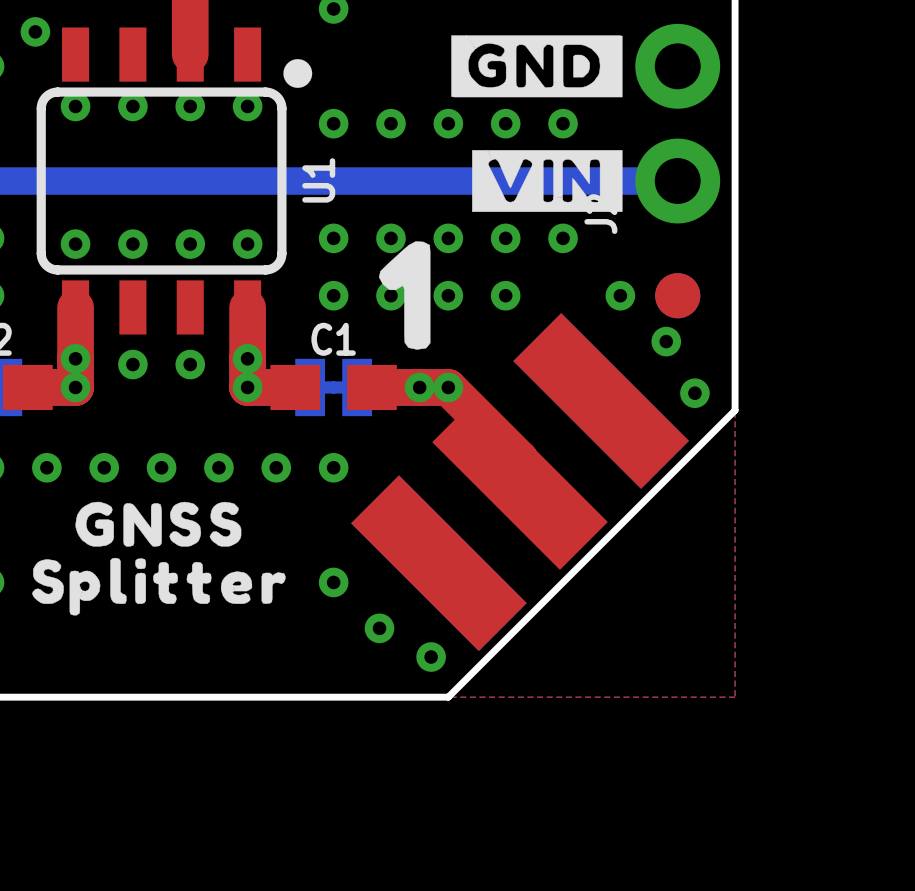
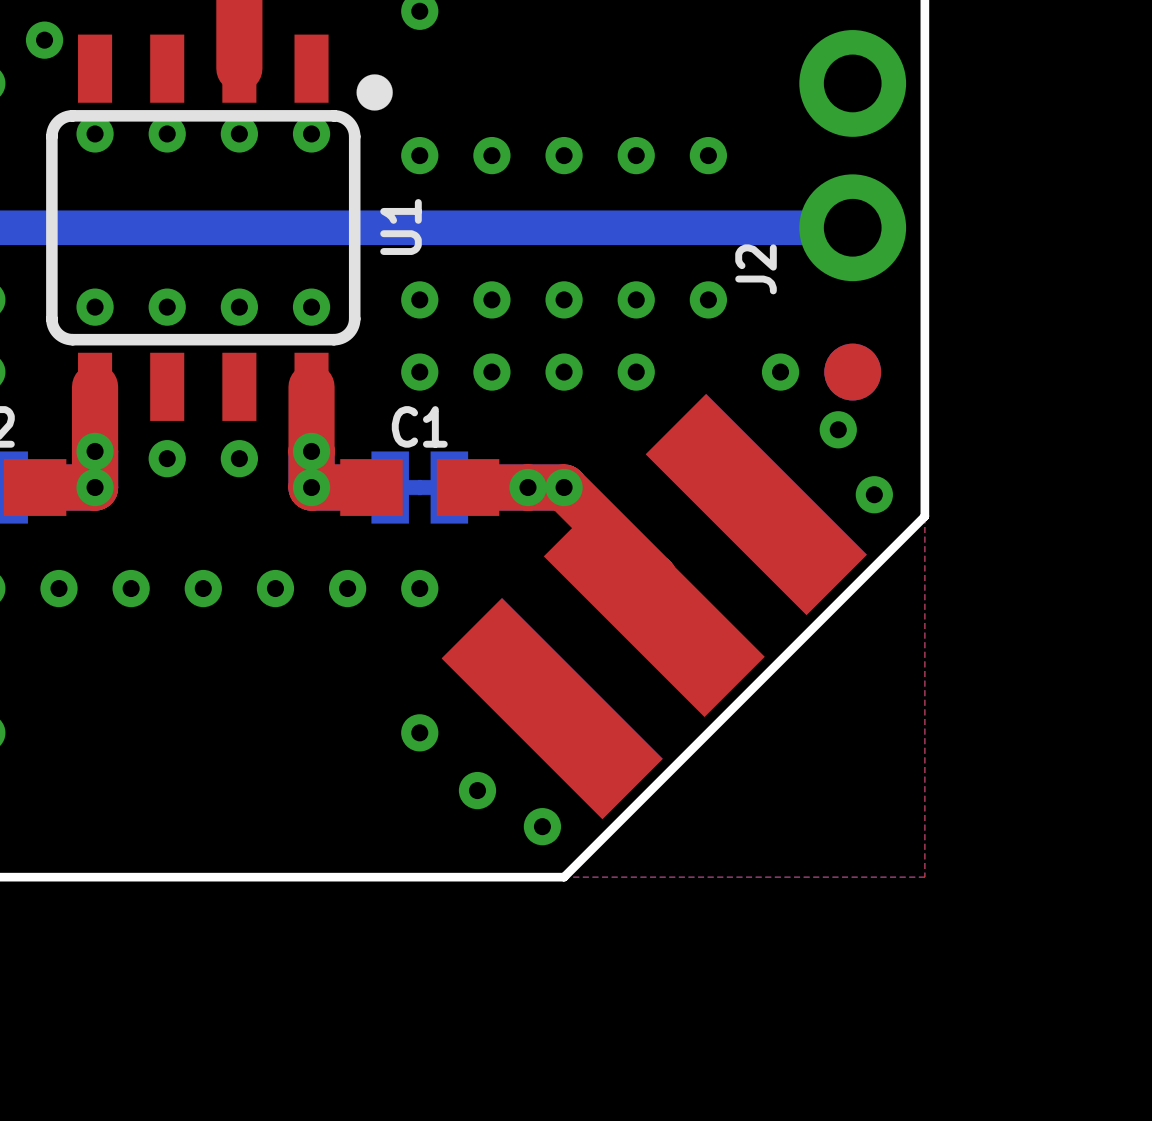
drawing: [378, 35, 623, 350] -> none
drawing: [32, 501, 286, 616] -> none

